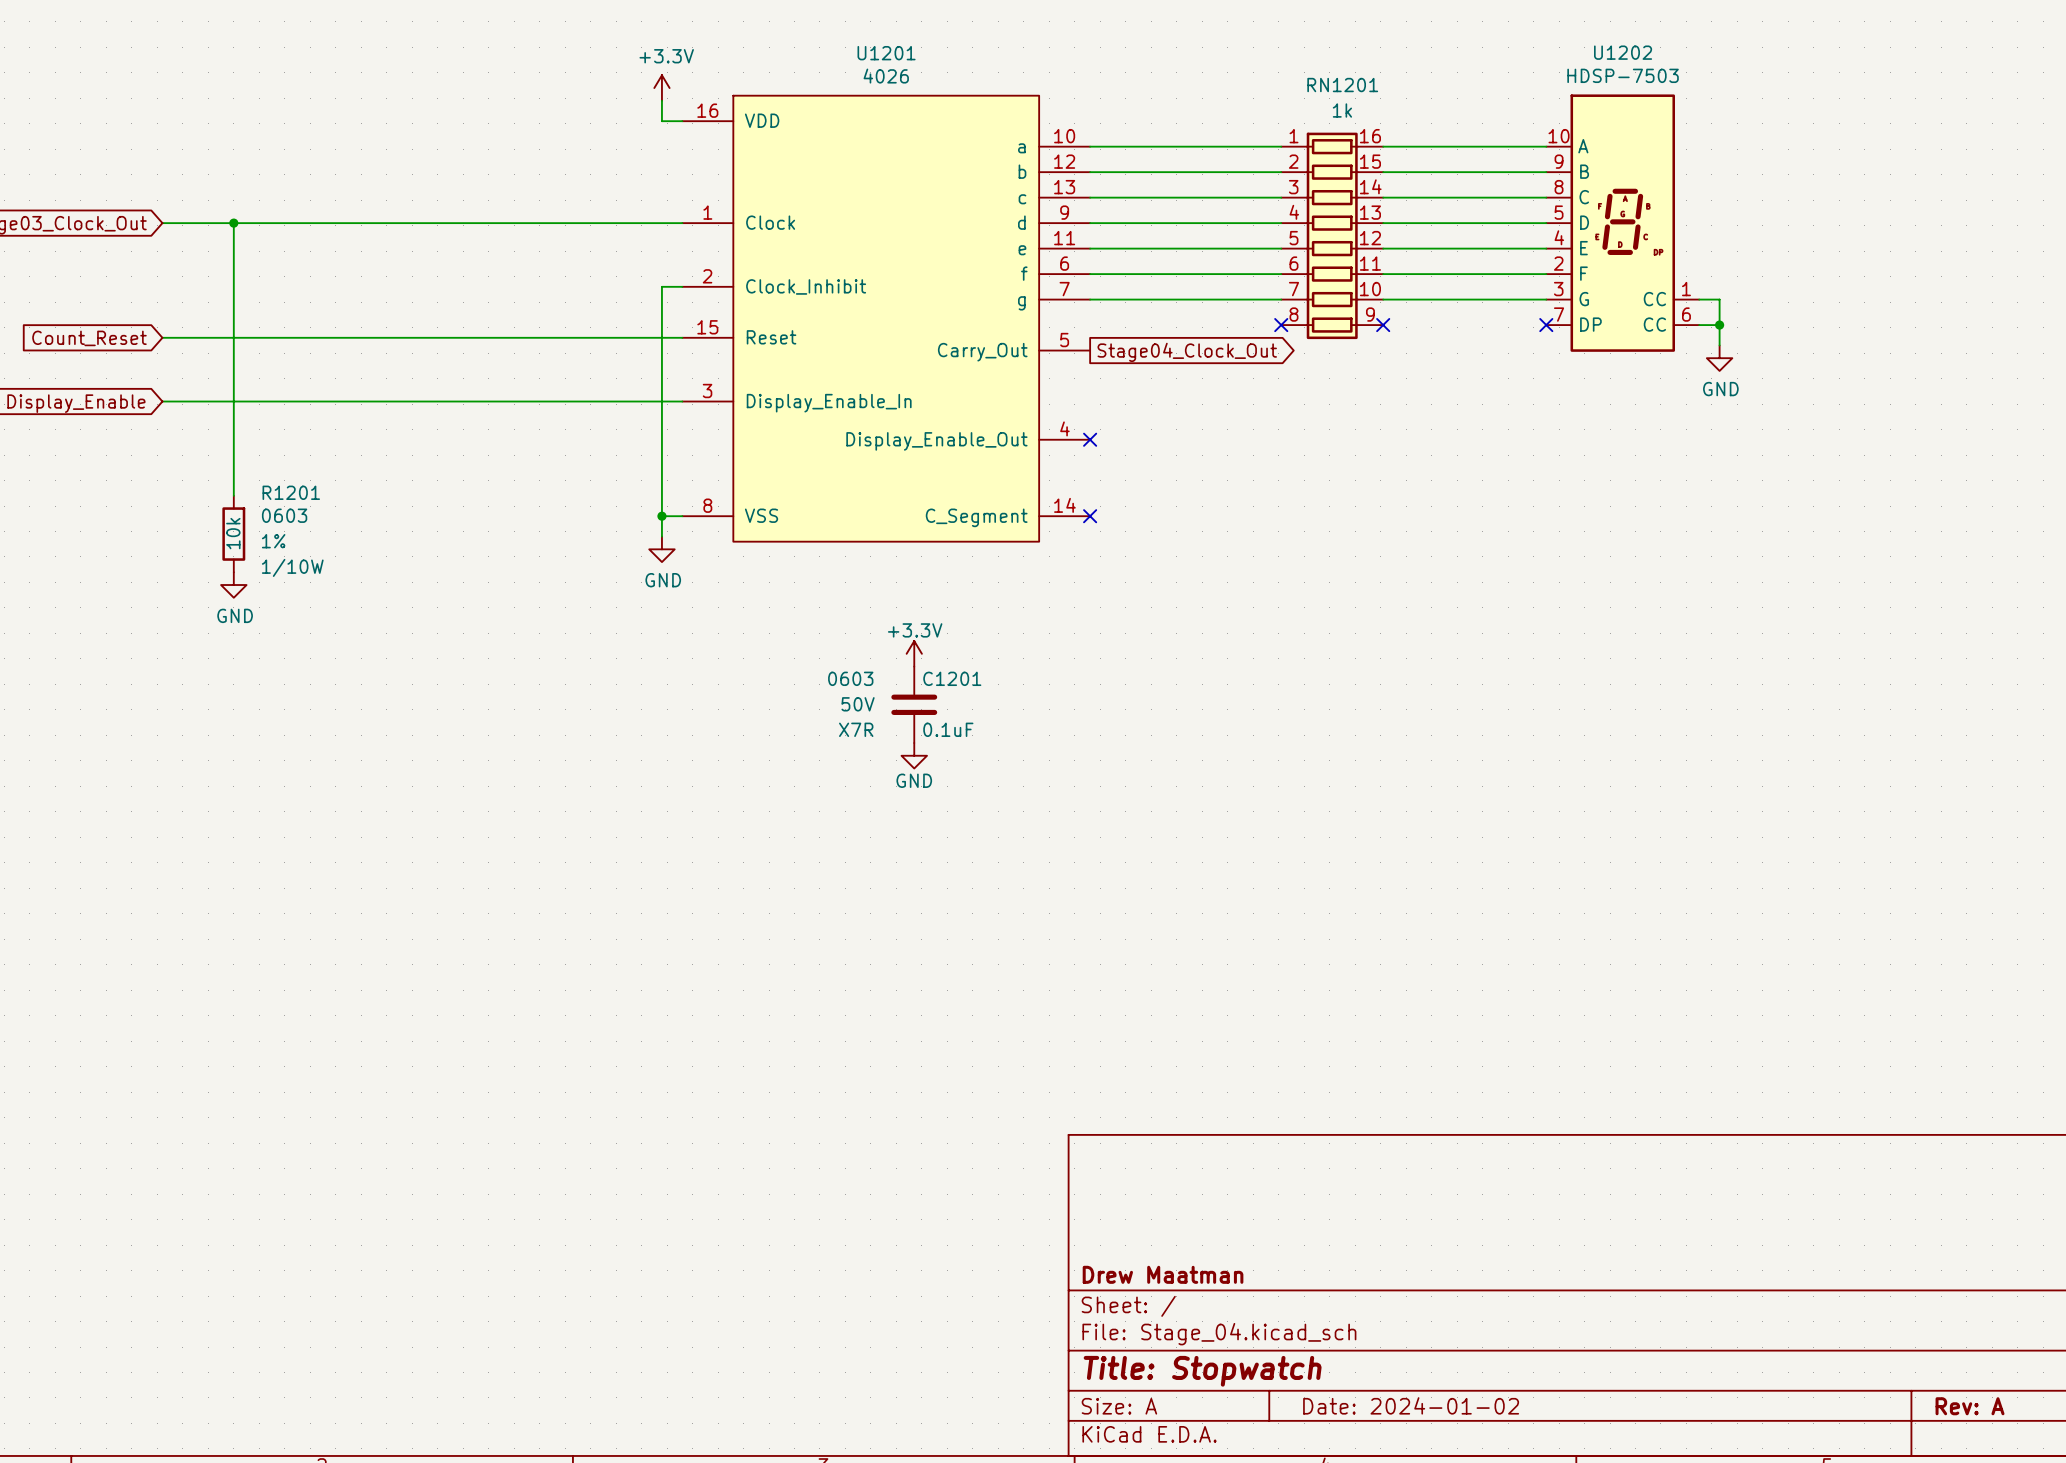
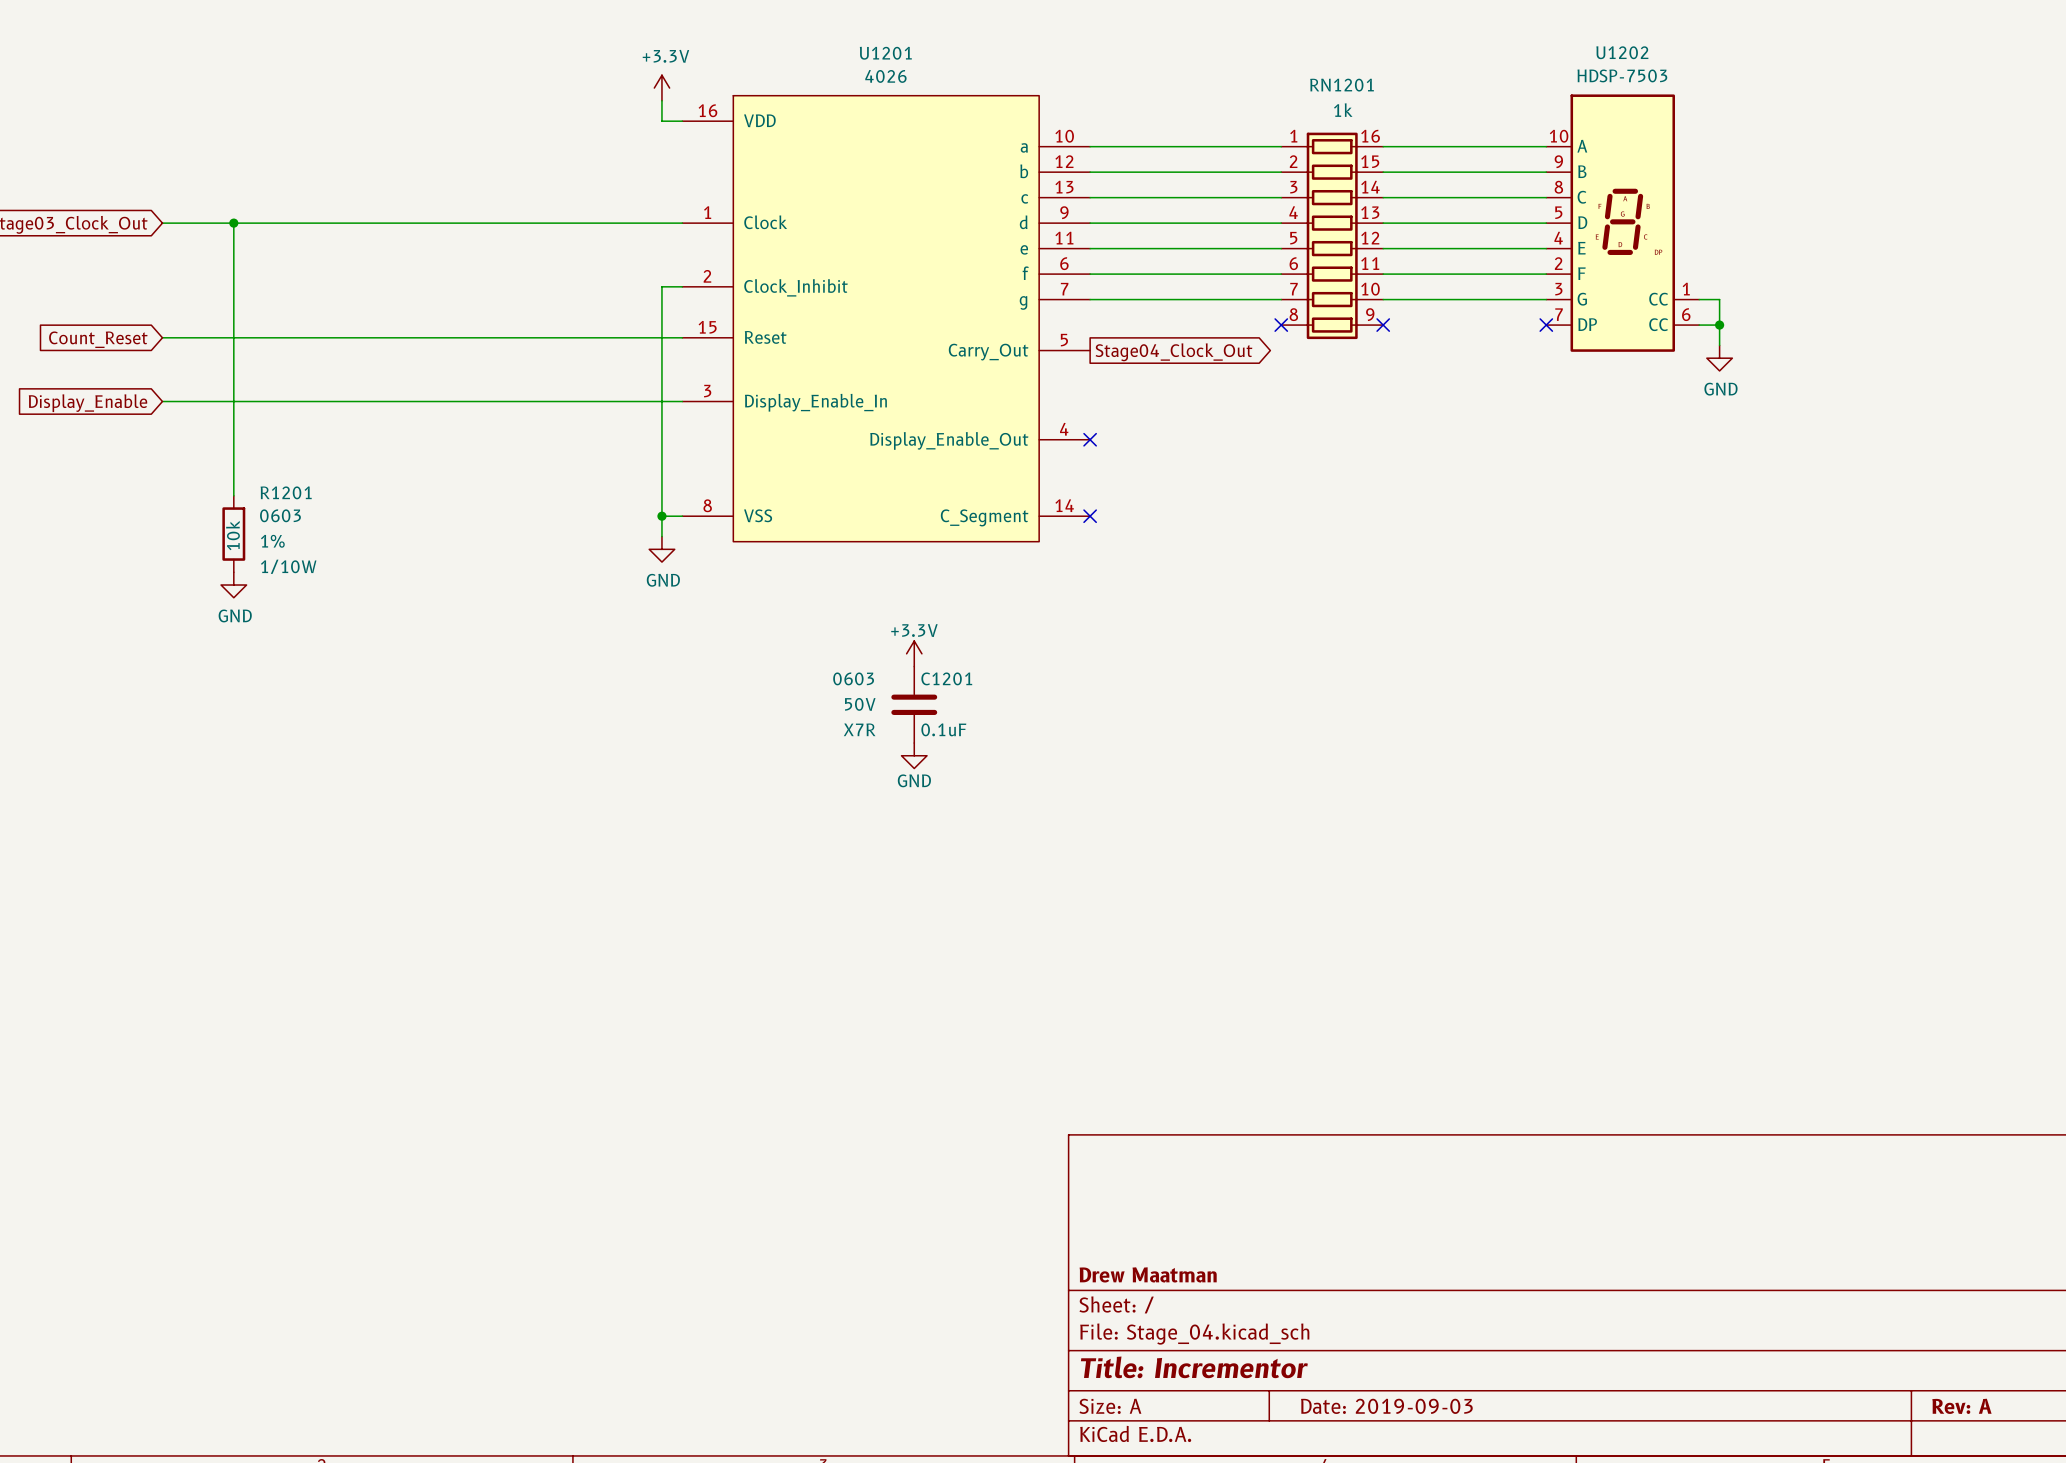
title block: Title: Stopwatch (1202, 1371) -> Title: Incrementor (1194, 1367)
title block: Date: 2024-01-02 (1411, 1405) -> Date: 2019-09-03 (1386, 1406)

